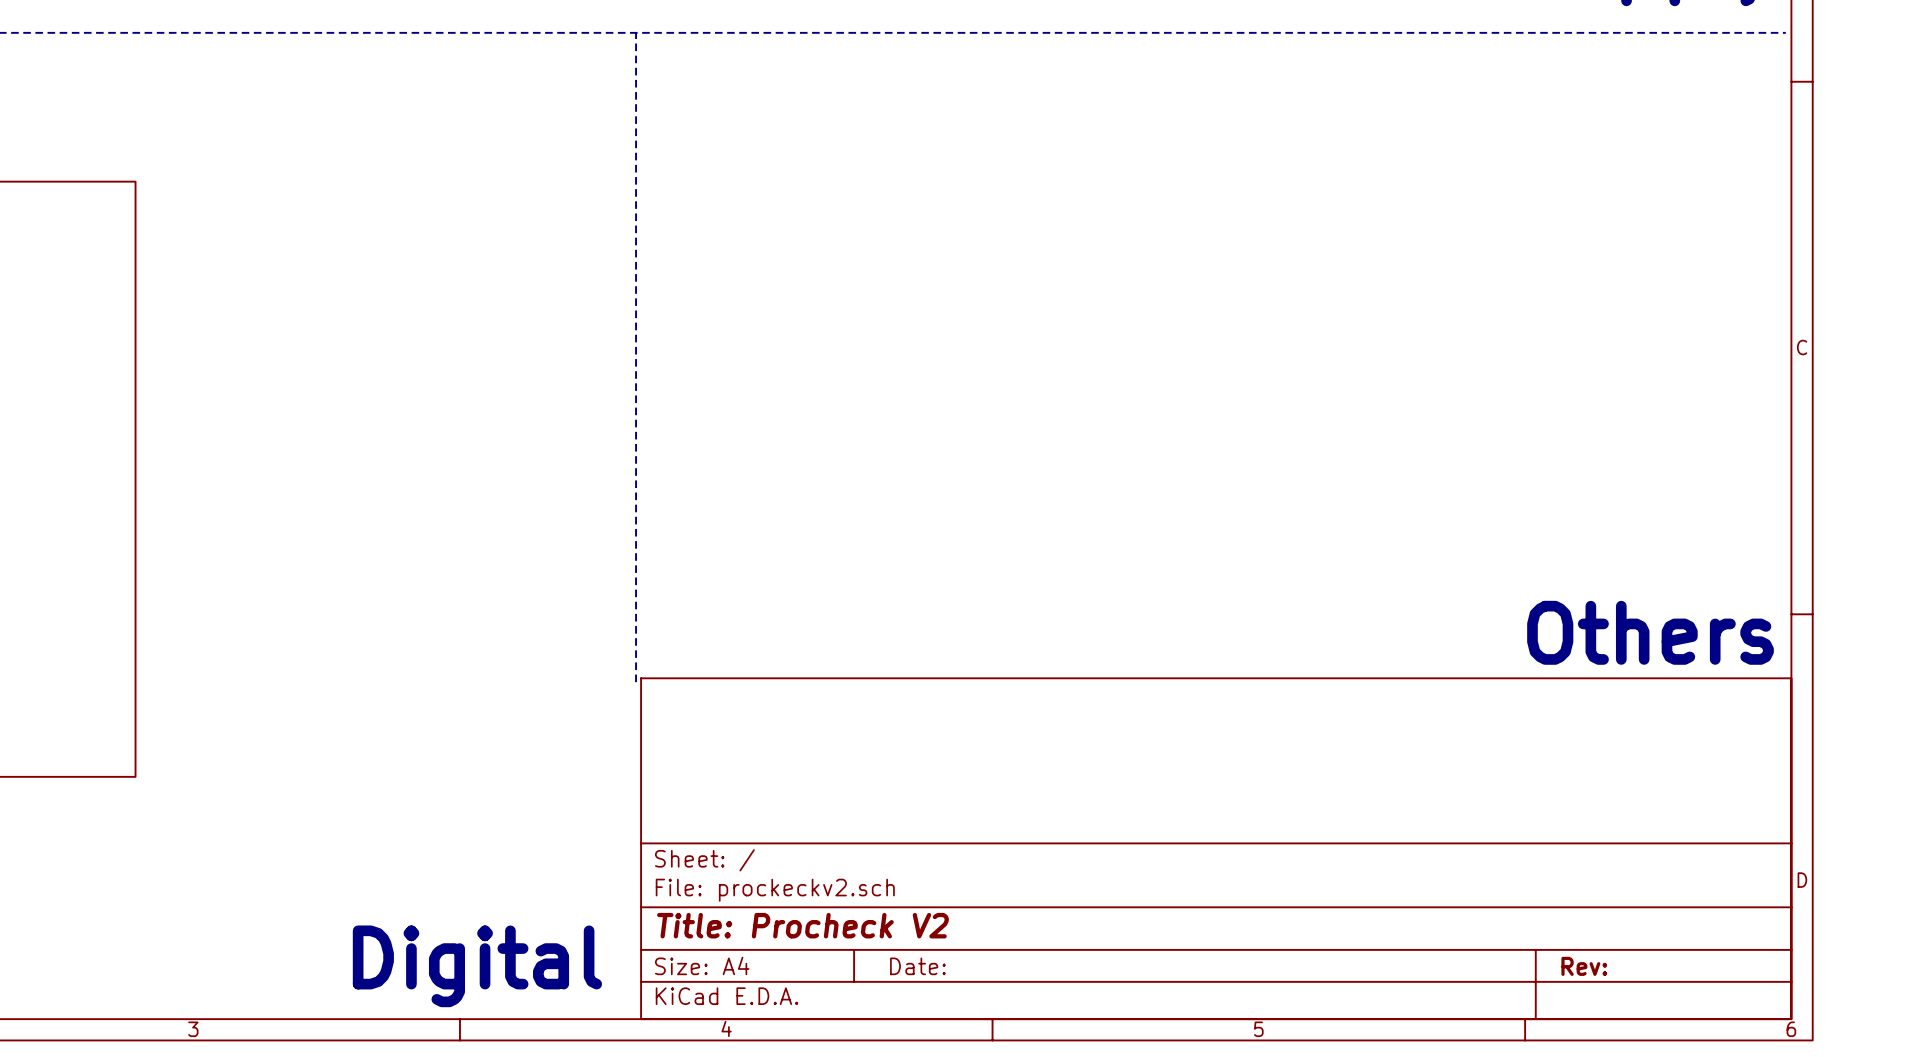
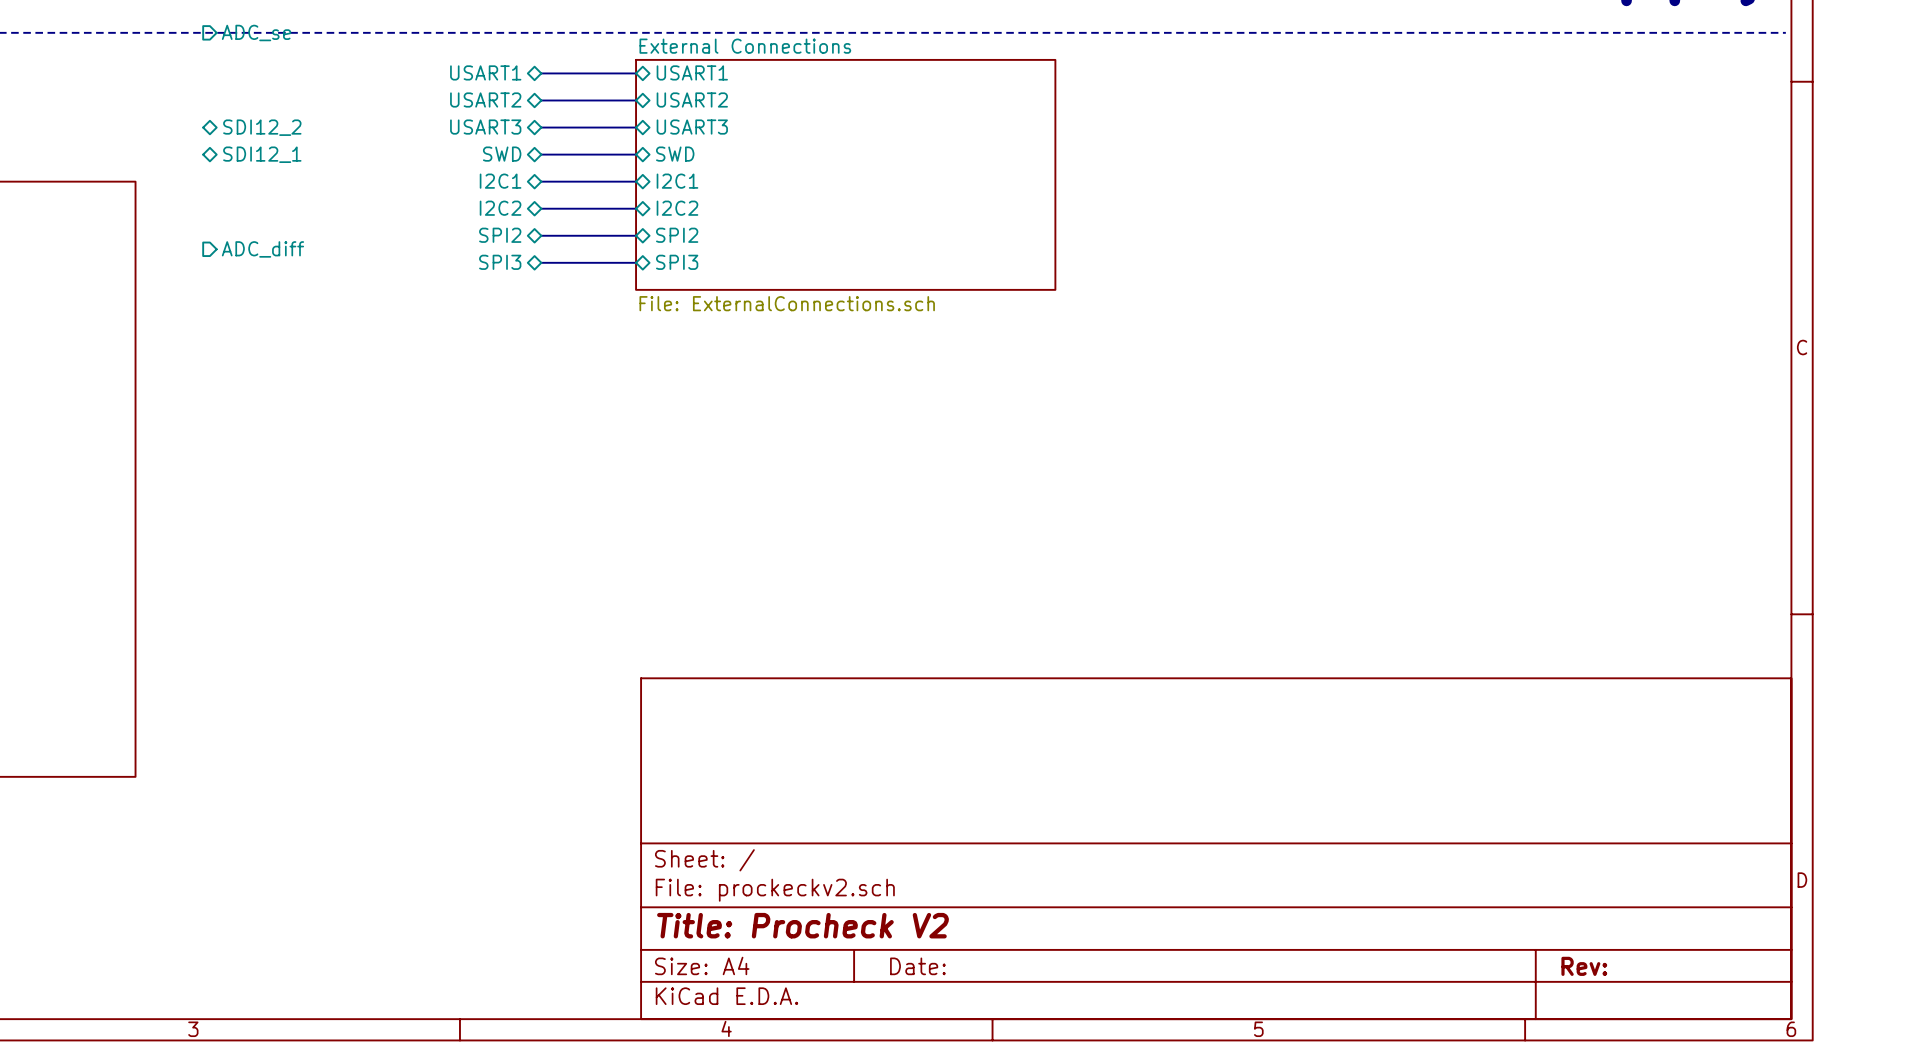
sheet pin: none -> ADC_se (256, 32)
line: (636, 32) (636, 682) -> none
sheet pin: none -> USART1 (485, 72)
sheet pin: none -> USART1 (692, 72)
bus: none -> (541, 73) (636, 73)
sheet pin: none -> USART2 (485, 99)
sheet pin: none -> USART2 (692, 99)
bus: none -> (541, 100) (636, 100)
sheet pin: none -> SDI12_2 (262, 127)
sheet pin: none -> USART3 (485, 127)
bus: none -> (541, 127) (636, 127)
sheet pin: none -> USART3 (692, 127)
sheet pin: none -> SDI12_1 (262, 154)
sheet pin: none -> SWD (502, 154)
bus: none -> (541, 154) (636, 154)
sheet pin: none -> SWD (675, 154)
sheet External Connections: none -> File: ExternalConnections.sch (845, 174)
sheet pin: none -> I2C1 (500, 181)
bus: none -> (541, 181) (636, 181)
sheet pin: none -> I2C1 (677, 181)
sheet pin: none -> I2C2 (500, 208)
bus: none -> (541, 208) (636, 208)
sheet pin: none -> I2C2 (677, 208)
sheet pin: none -> SPI2 (500, 235)
bus: none -> (541, 235) (636, 235)
sheet pin: none -> SPI2 (677, 235)
sheet pin: none -> ADC_diff (262, 249)
sheet pin: none -> SPI3 (500, 262)
bus: none -> (541, 262) (636, 262)
sheet pin: none -> SPI3 (677, 262)
text: Others (1650, 632) -> none
text: Digital (477, 966) -> none

